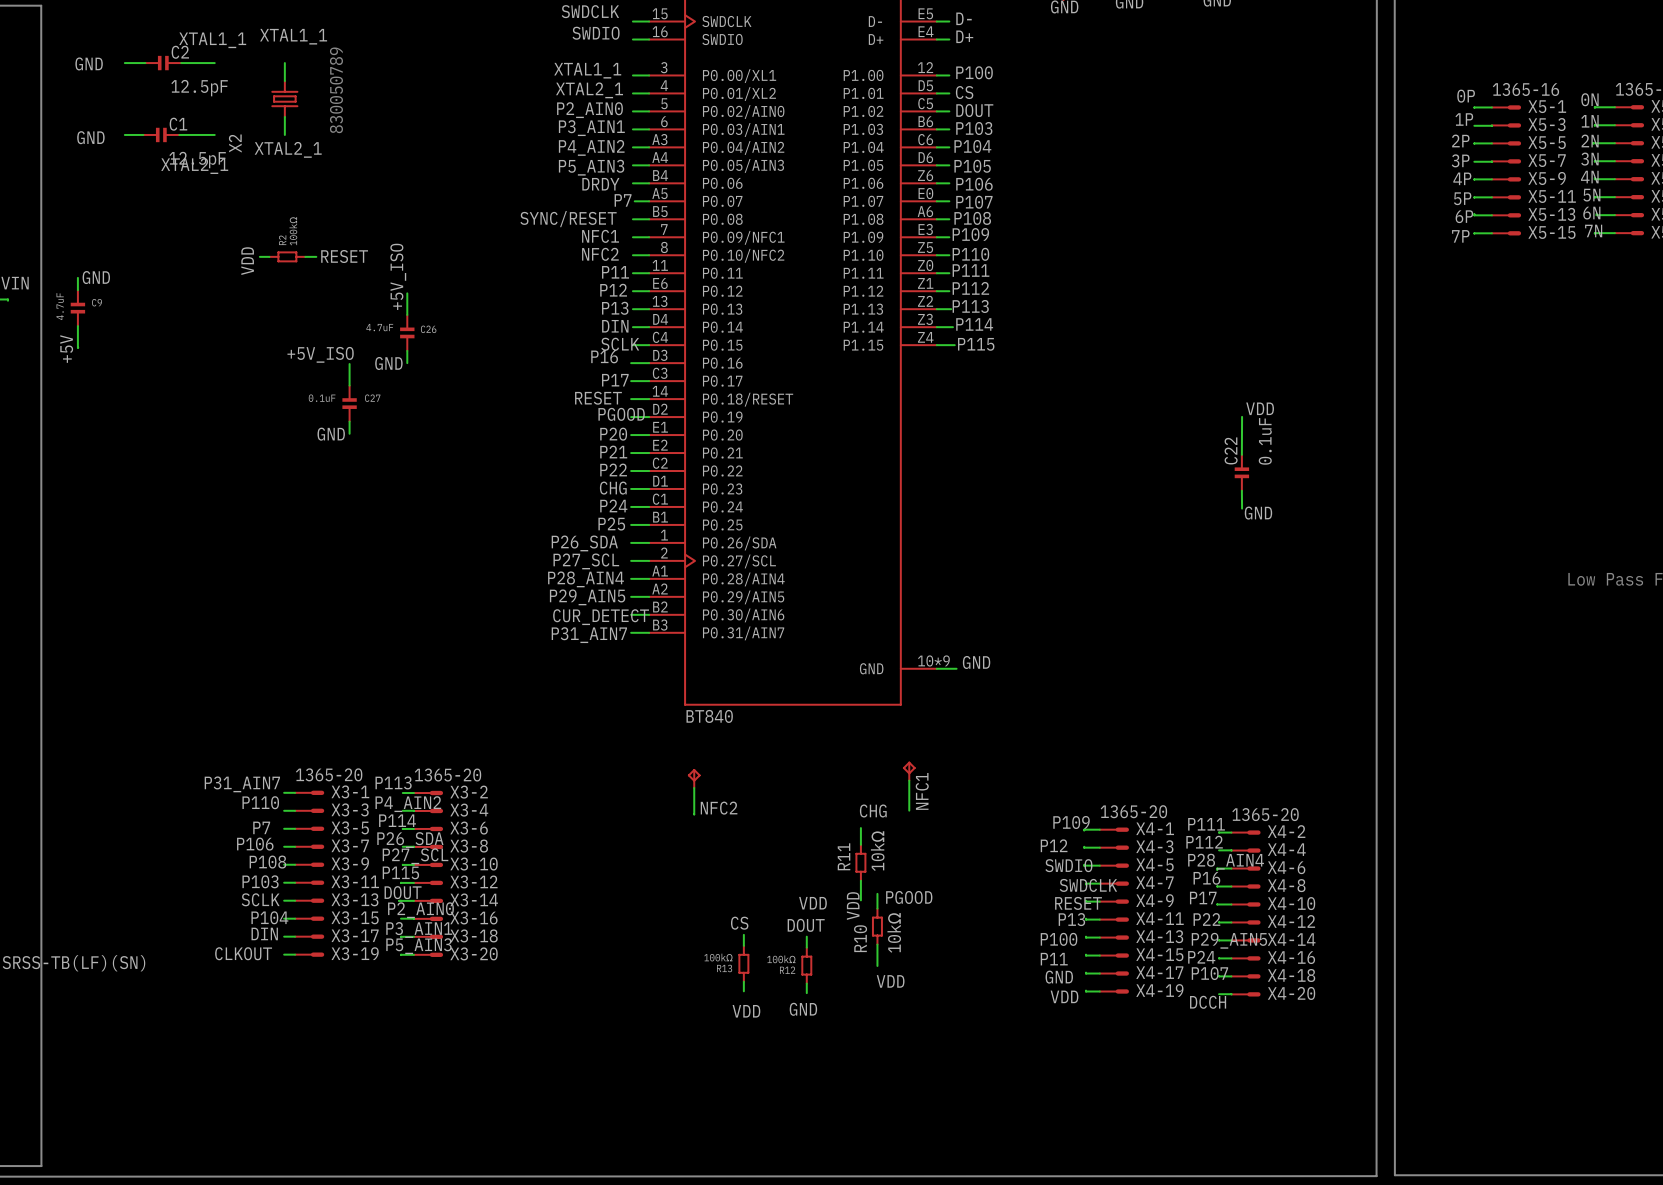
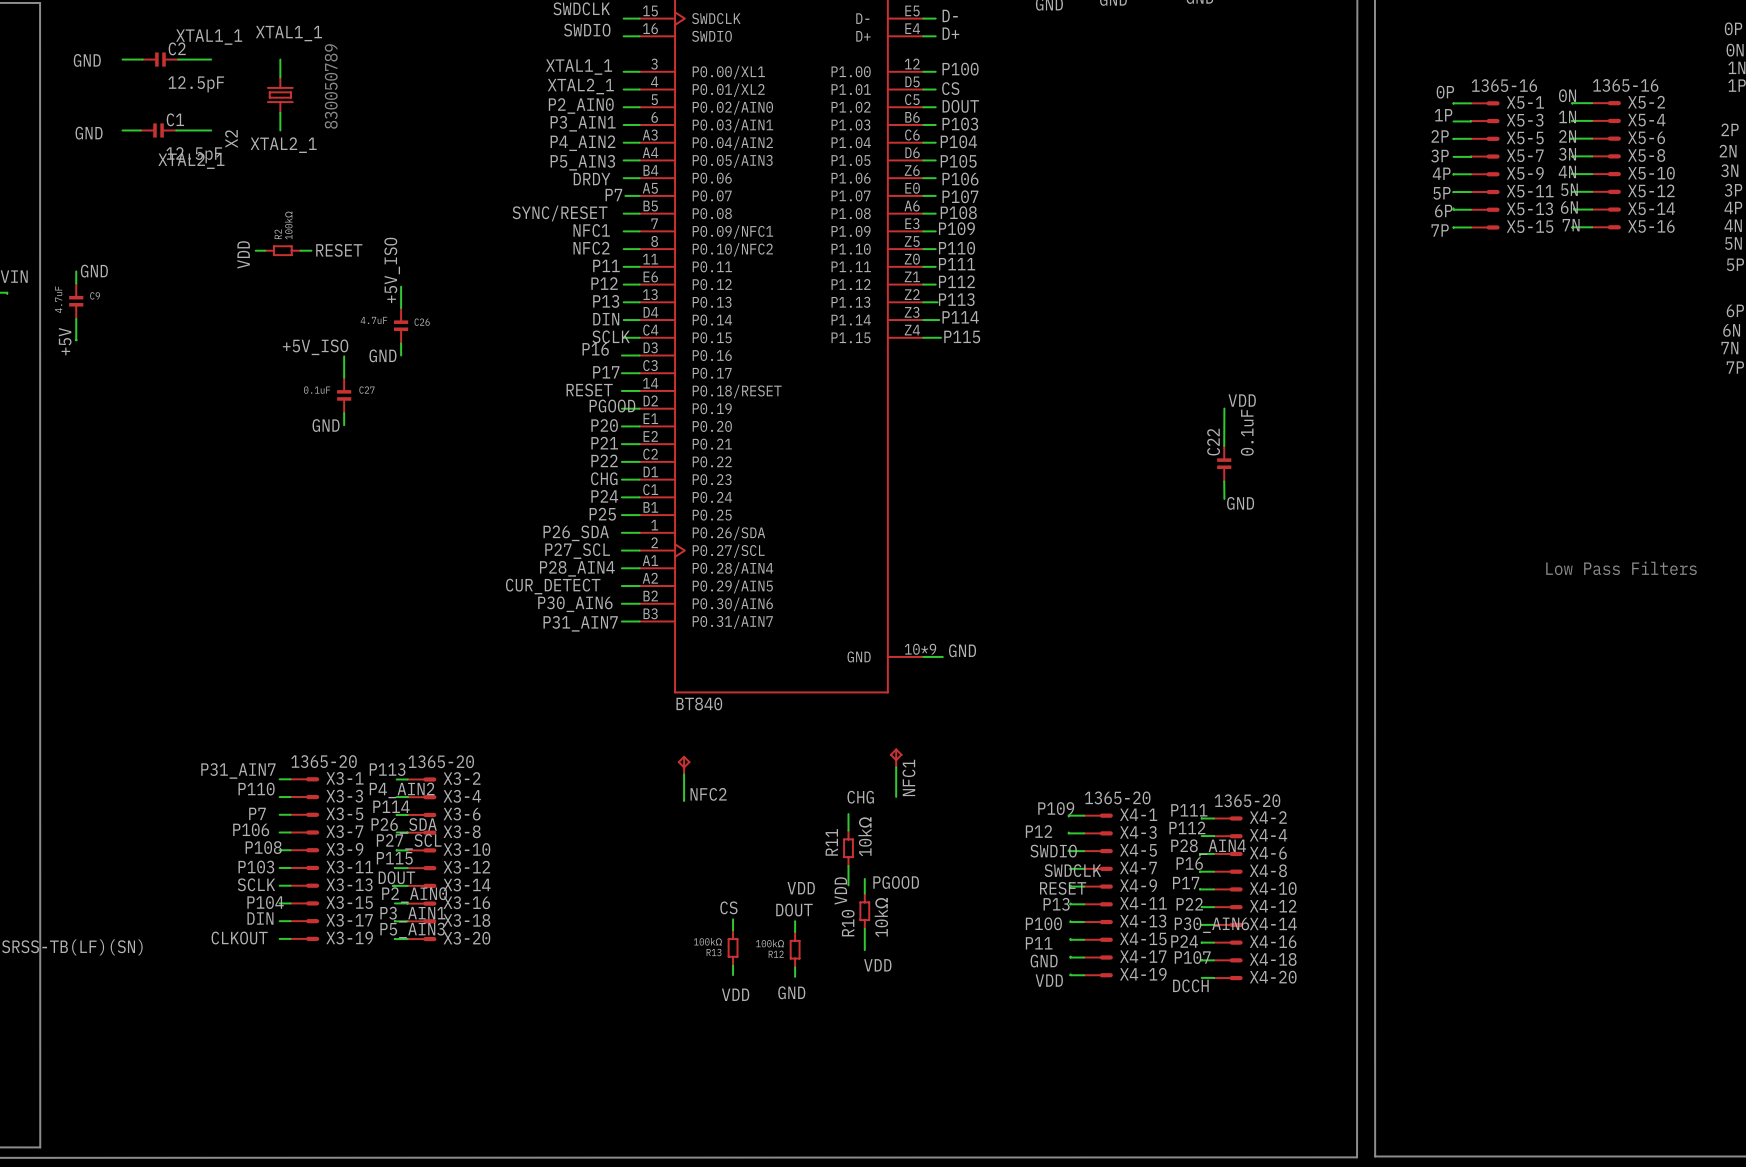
label: P29_AIN5 (587, 597) -> P30_AIN6 (575, 604)
label position: CUR_DETECT (601, 617) -> CUR_DETECT (553, 586)
label: P29_AIN5 (1229, 940) -> P30_AIN6 (1211, 925)

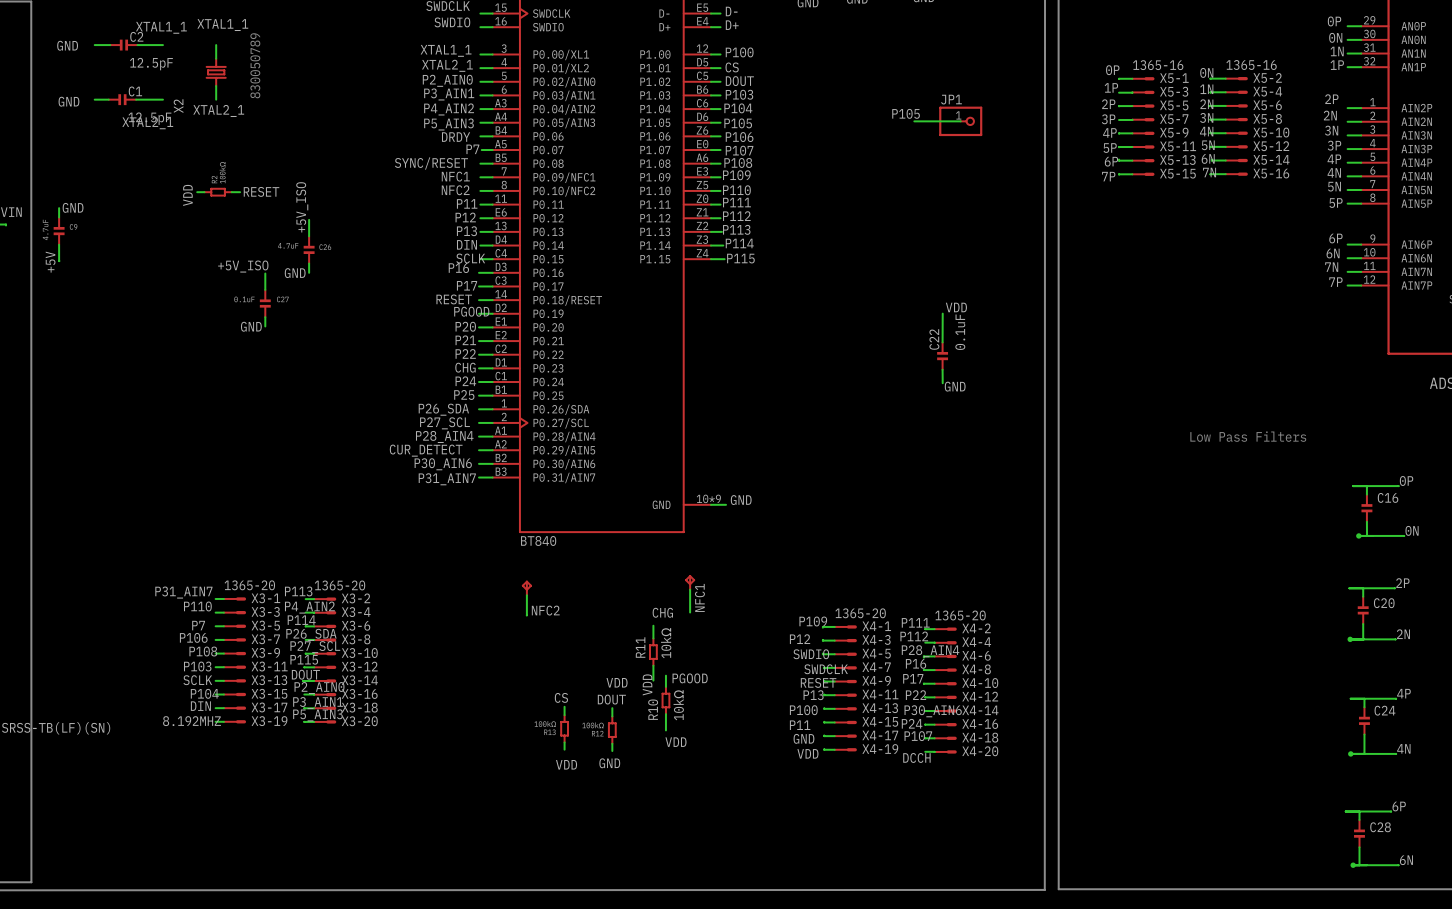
label: none -> P105 (906, 113)
wire: none -> (914, 121) (960, 121)
JP1: none -> (960, 121)
label: CLKOUT (239, 938) -> 8.192MHZ (192, 721)

